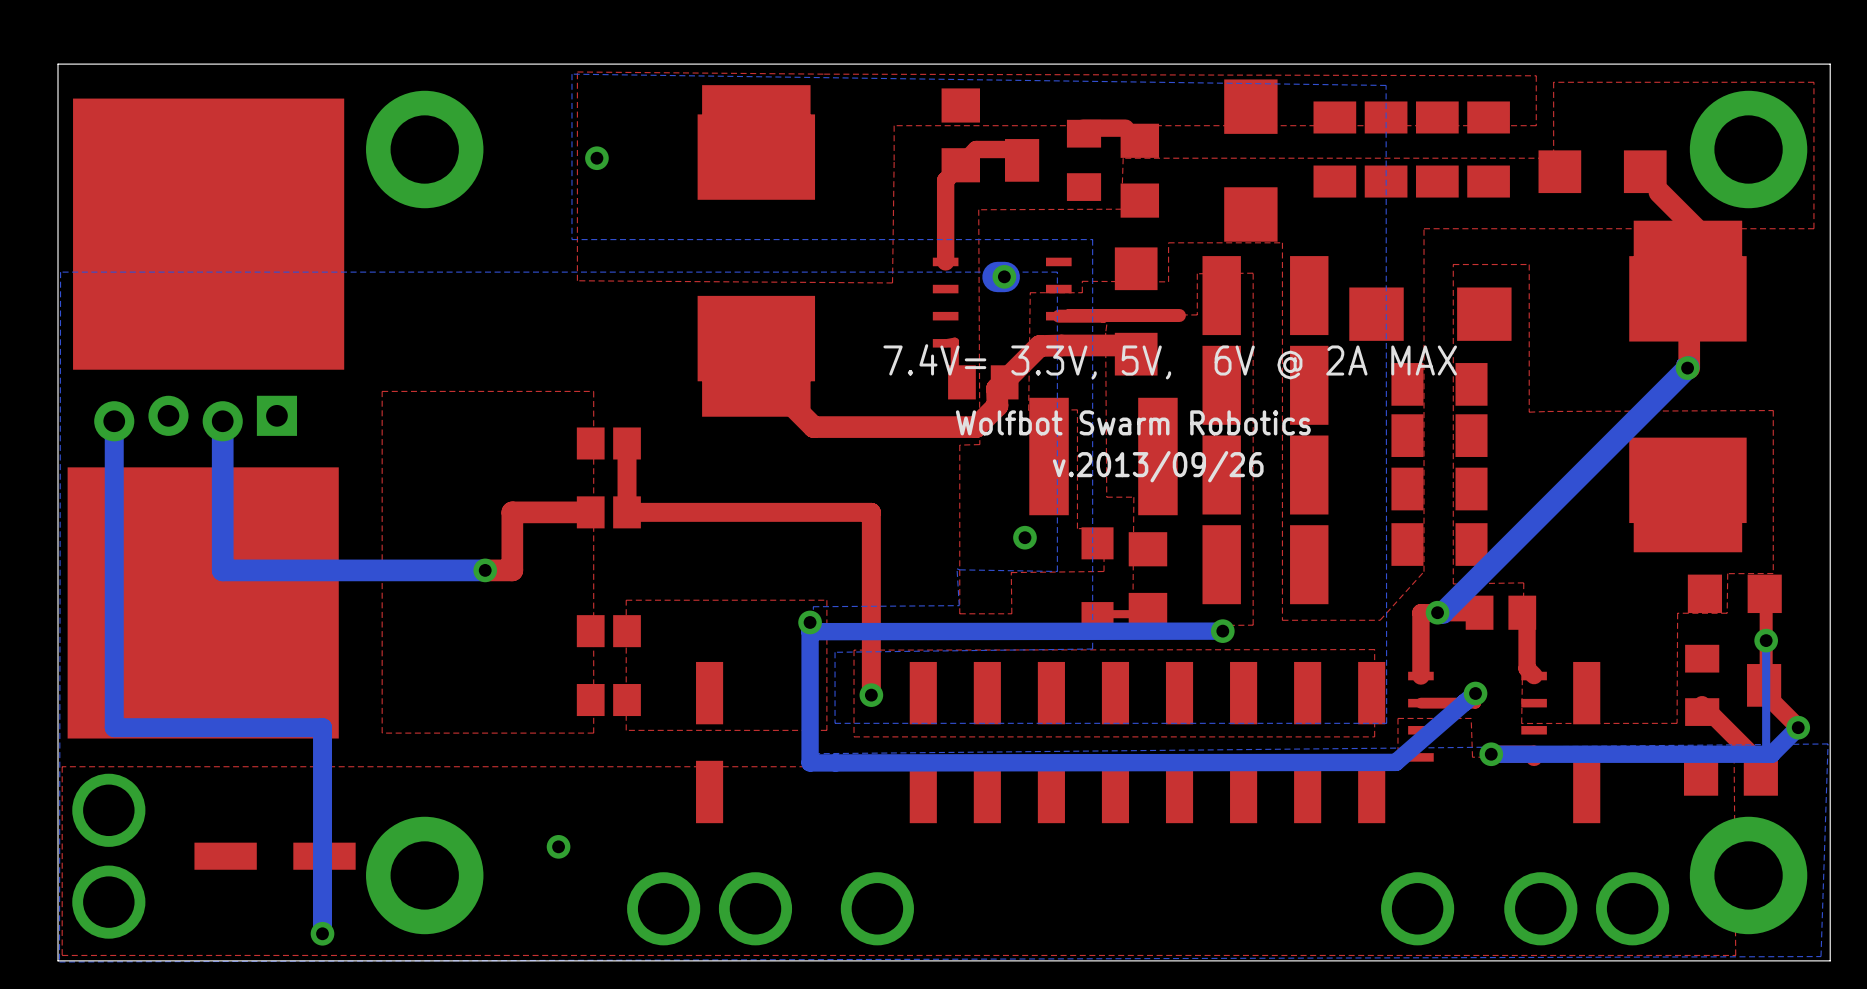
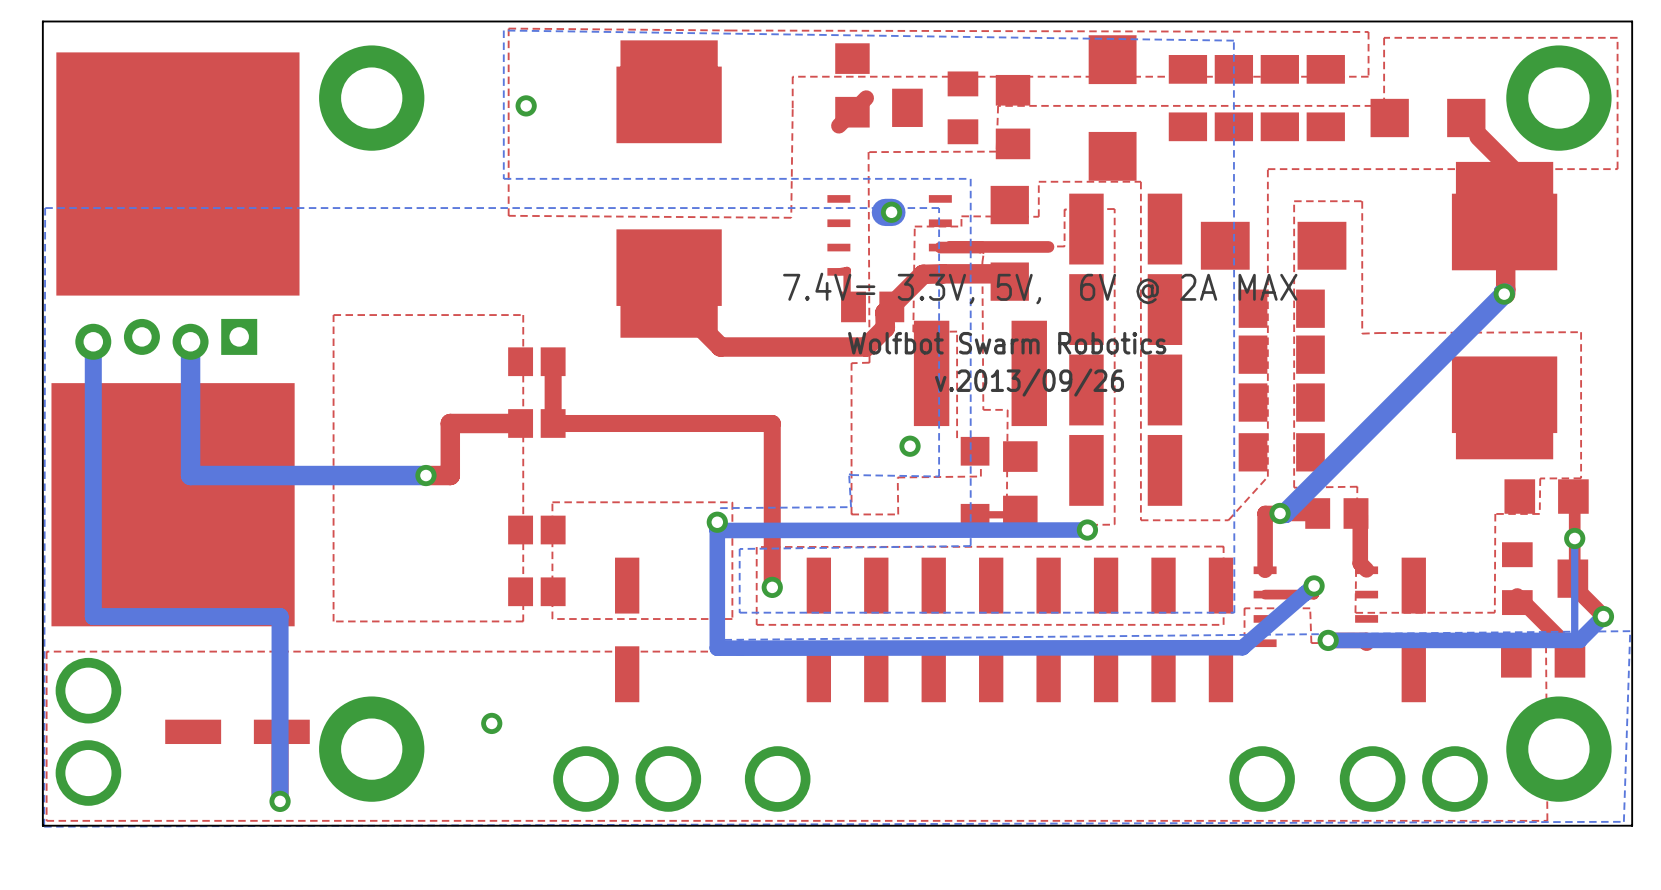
top track: (1125, 128) (1082, 128) -> none
top track: (1018, 149) (976, 149) -> none
top track: (945, 180) (945, 261) -> none

